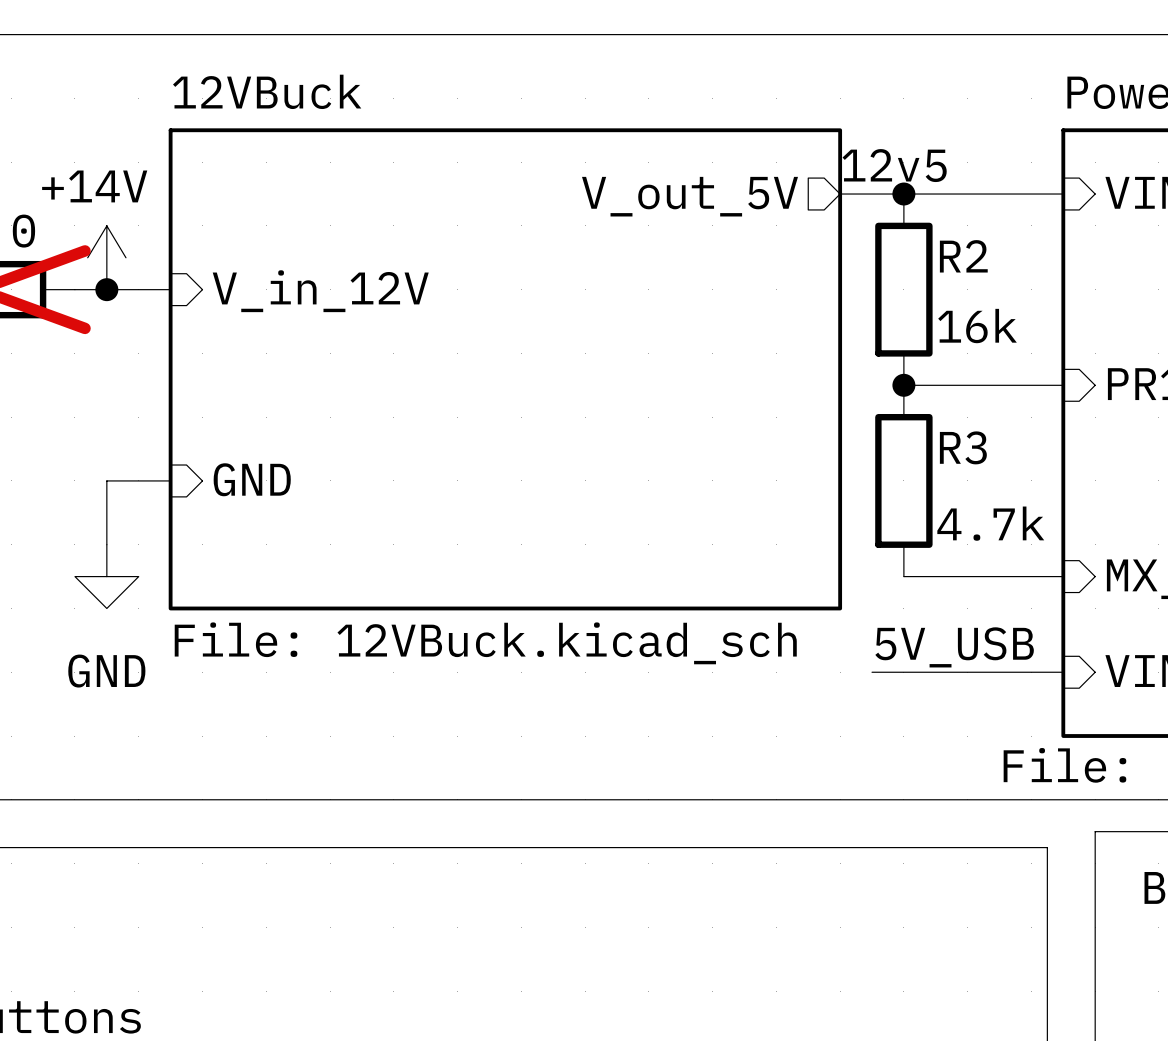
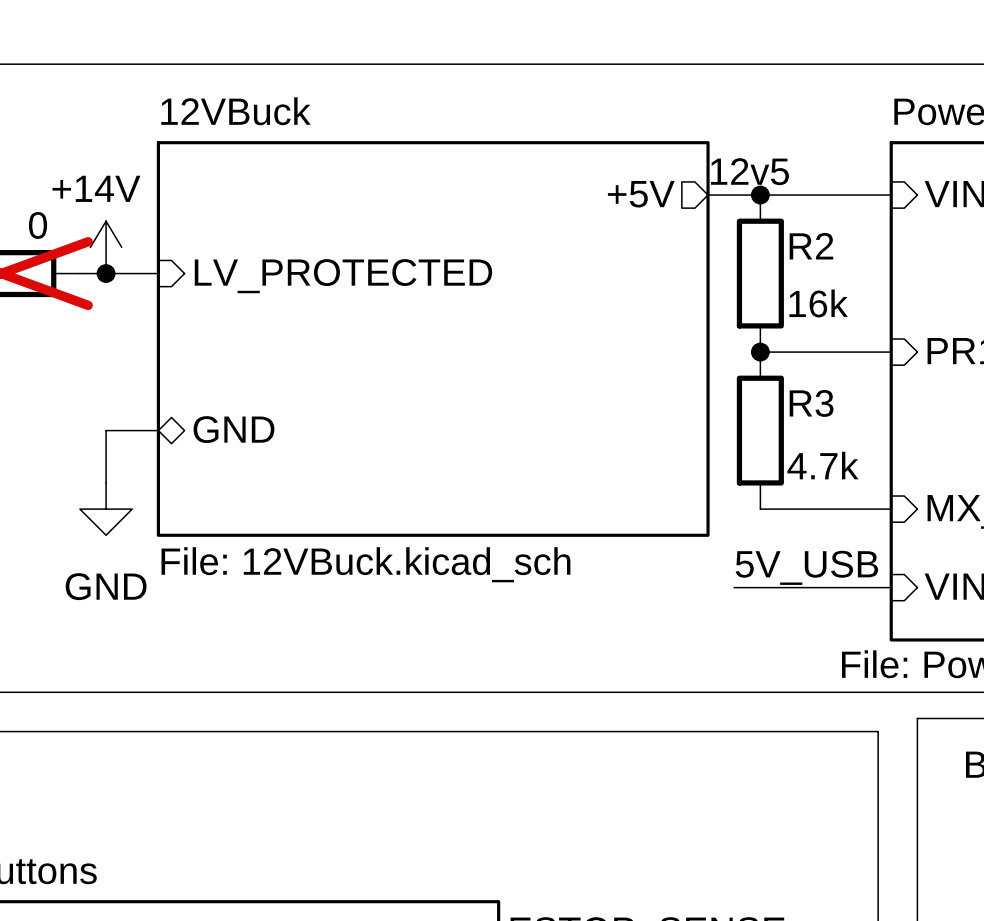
sheet pin: V_out_5V (690, 196) -> +5V (641, 194)
sheet pin: V_in_12V (320, 291) -> LV_PROTECTED (343, 276)
sheet pin shape: input (252, 479) -> bidirectional (233, 429)

